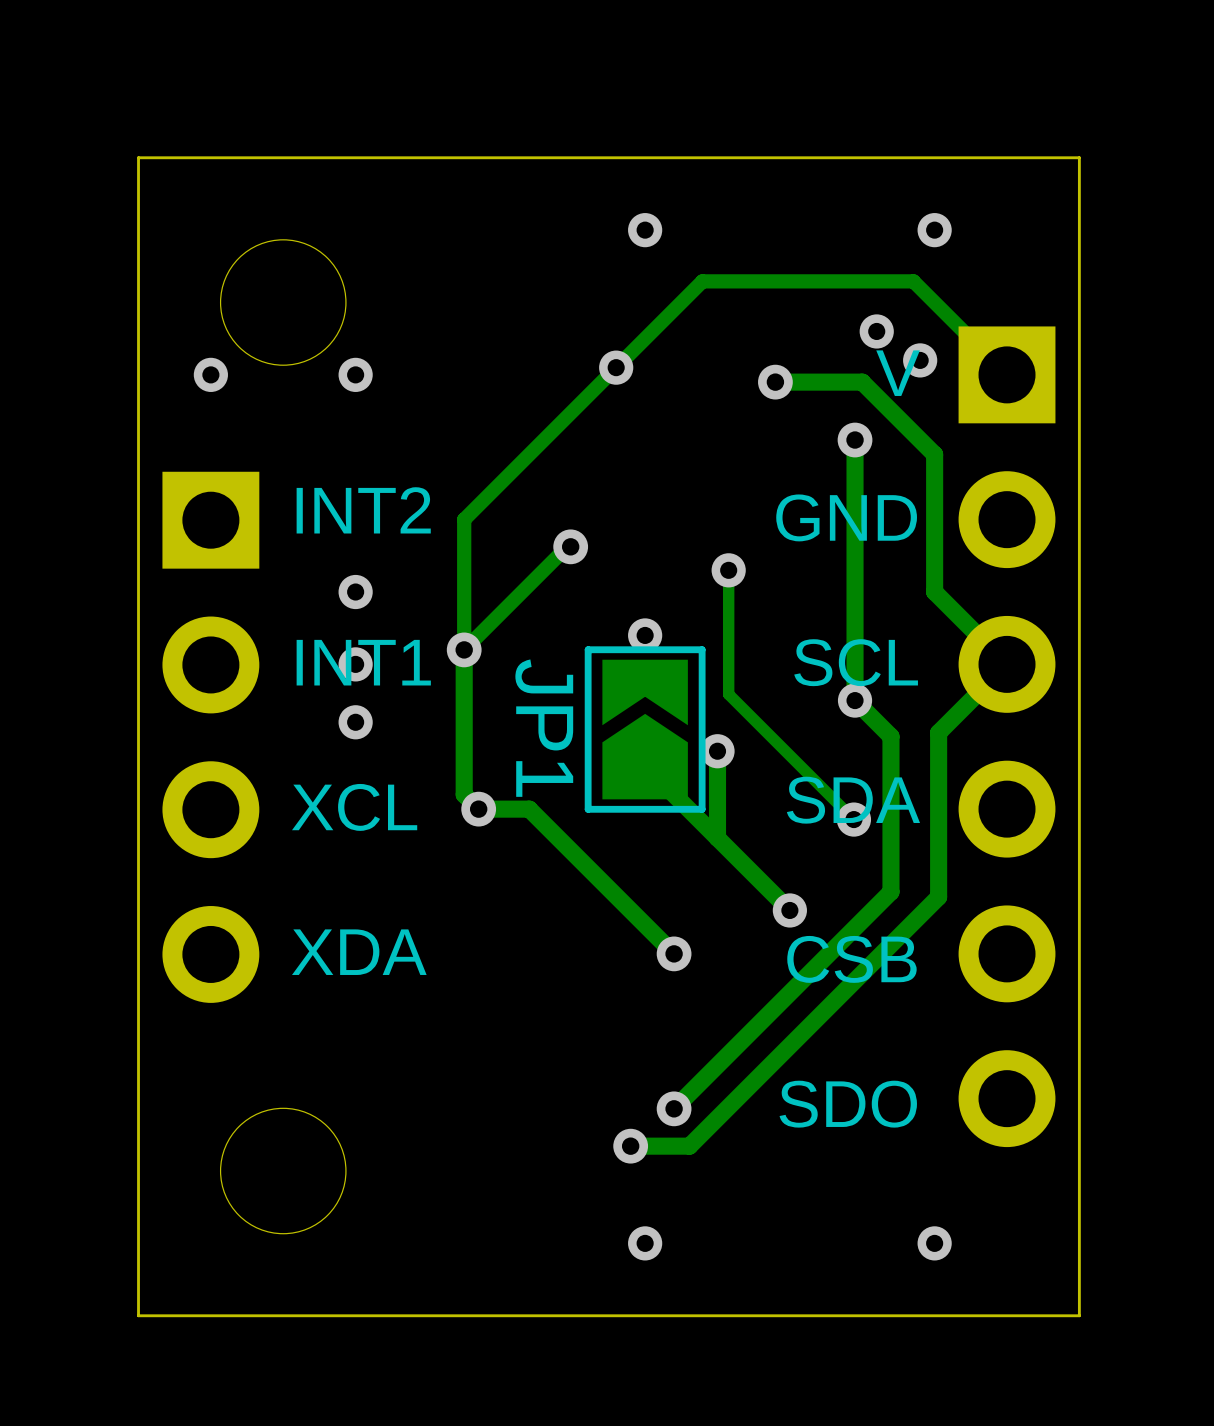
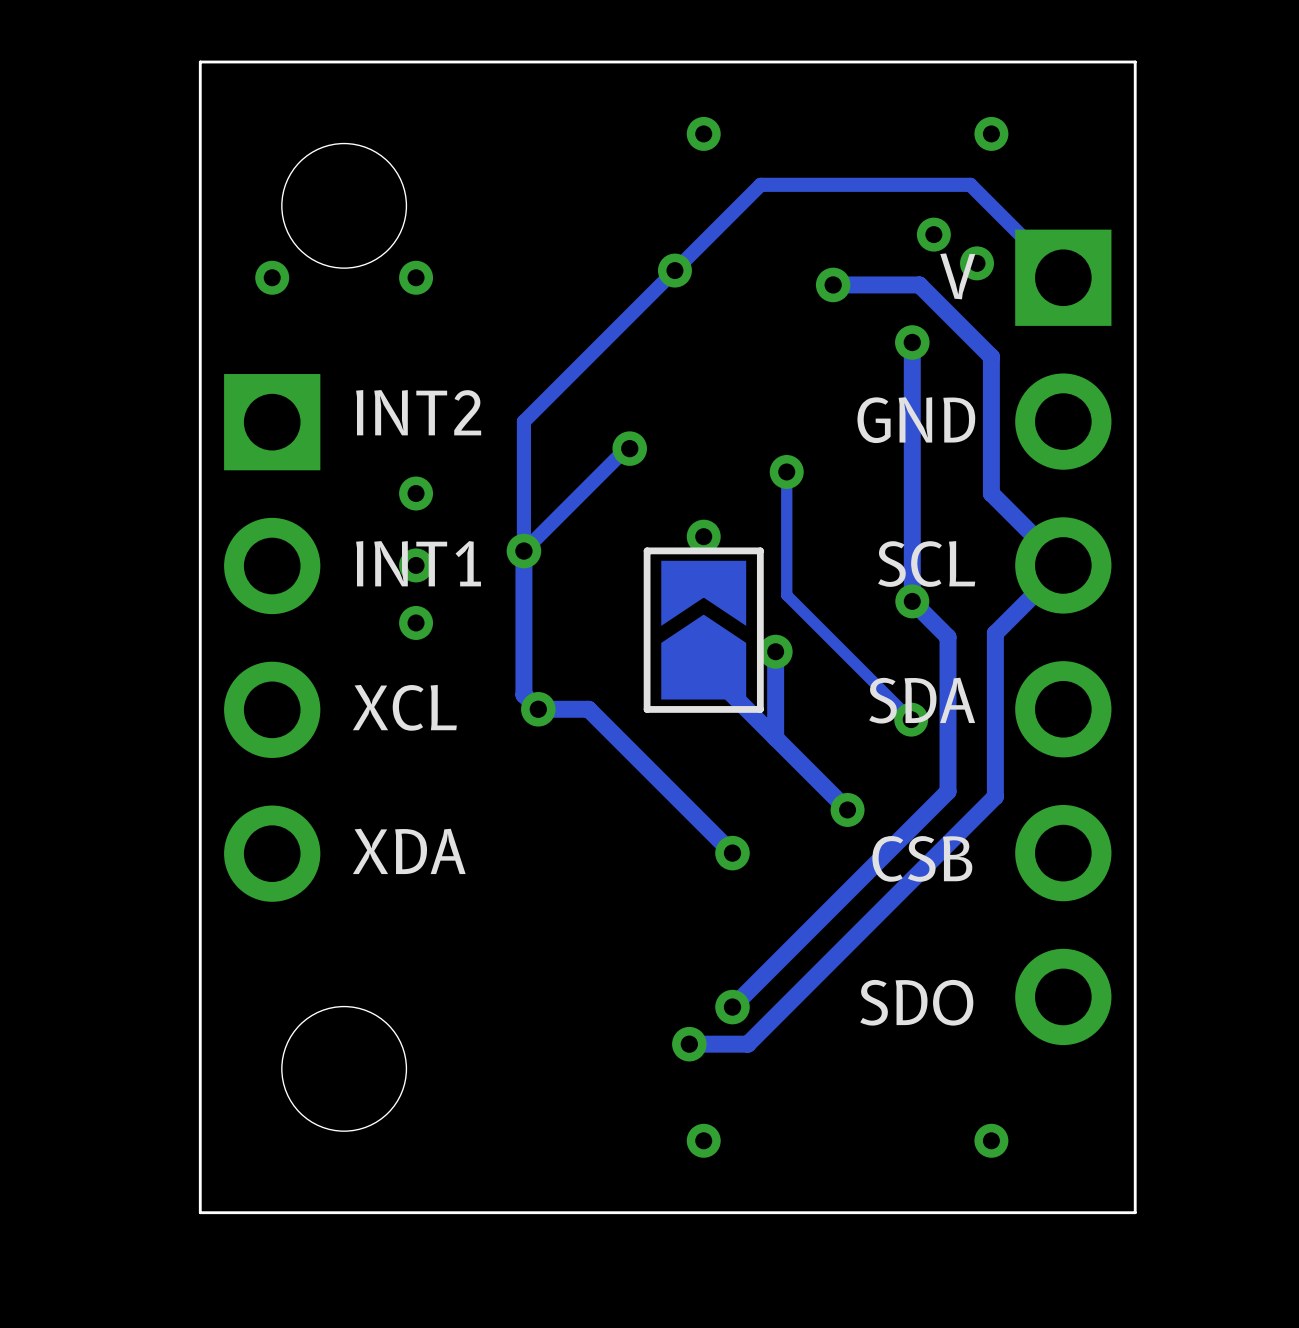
JP1 name: JP1 (544, 728) -> none

